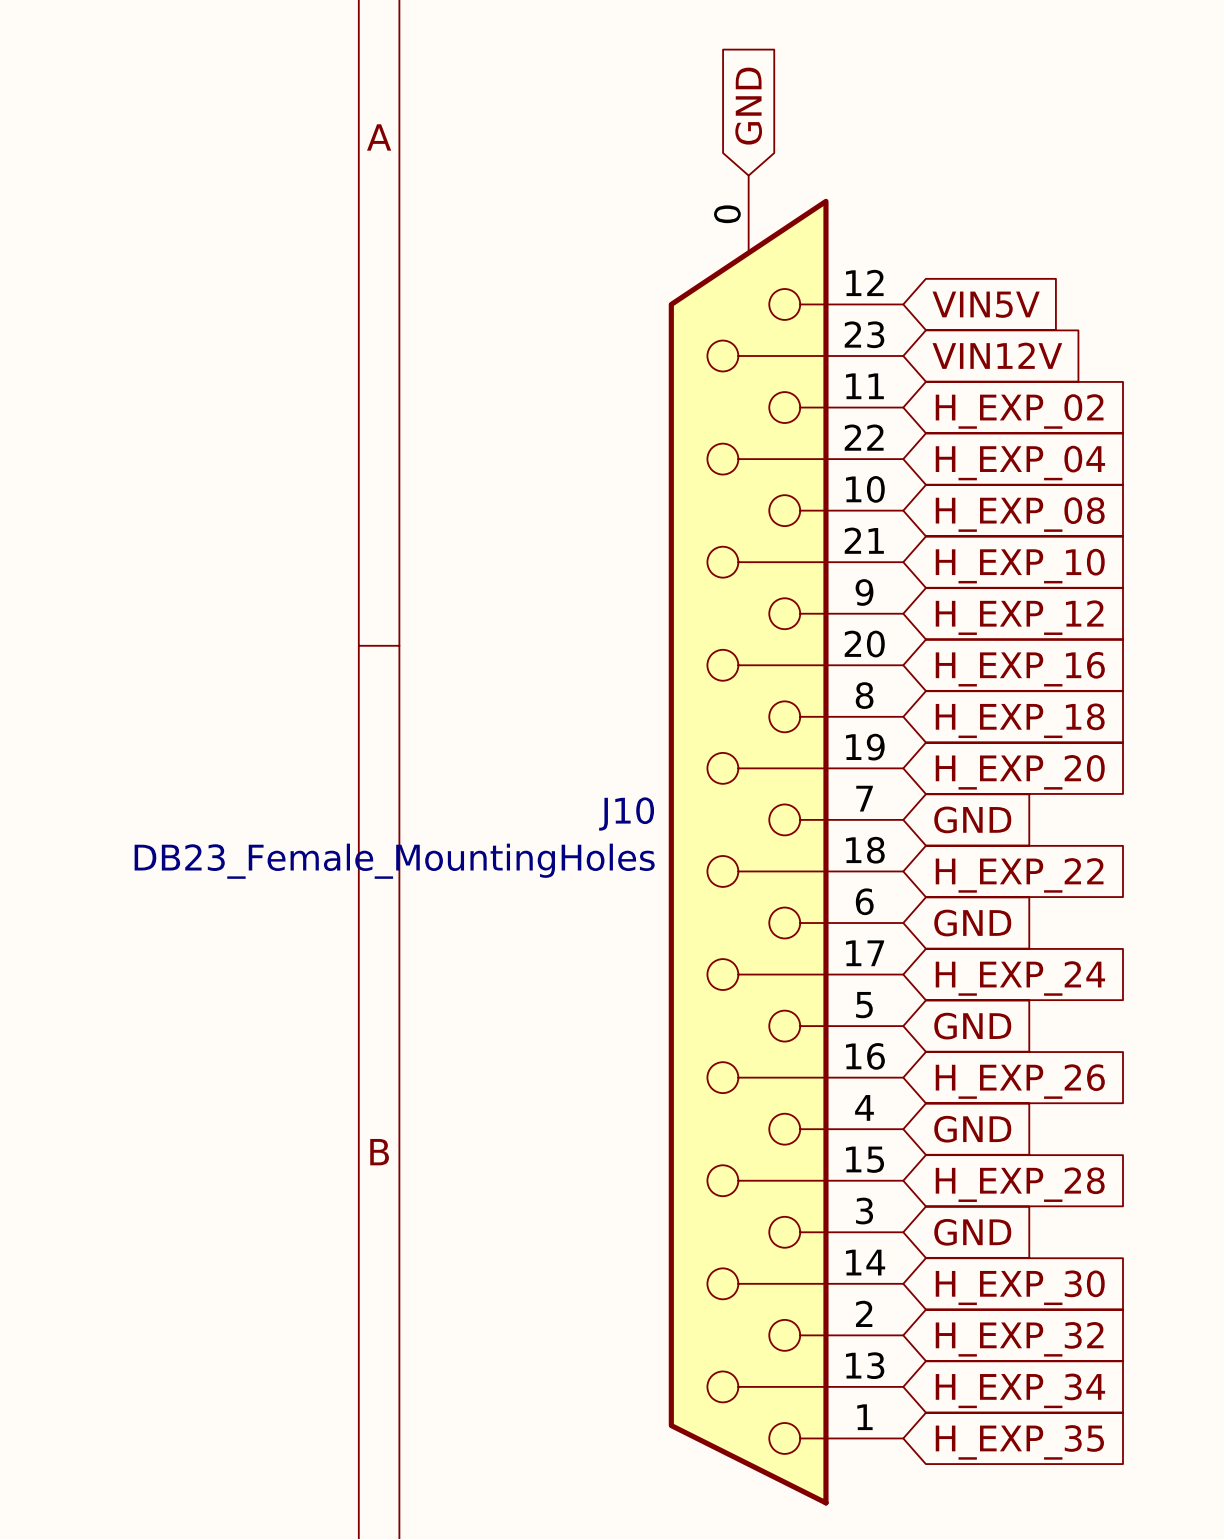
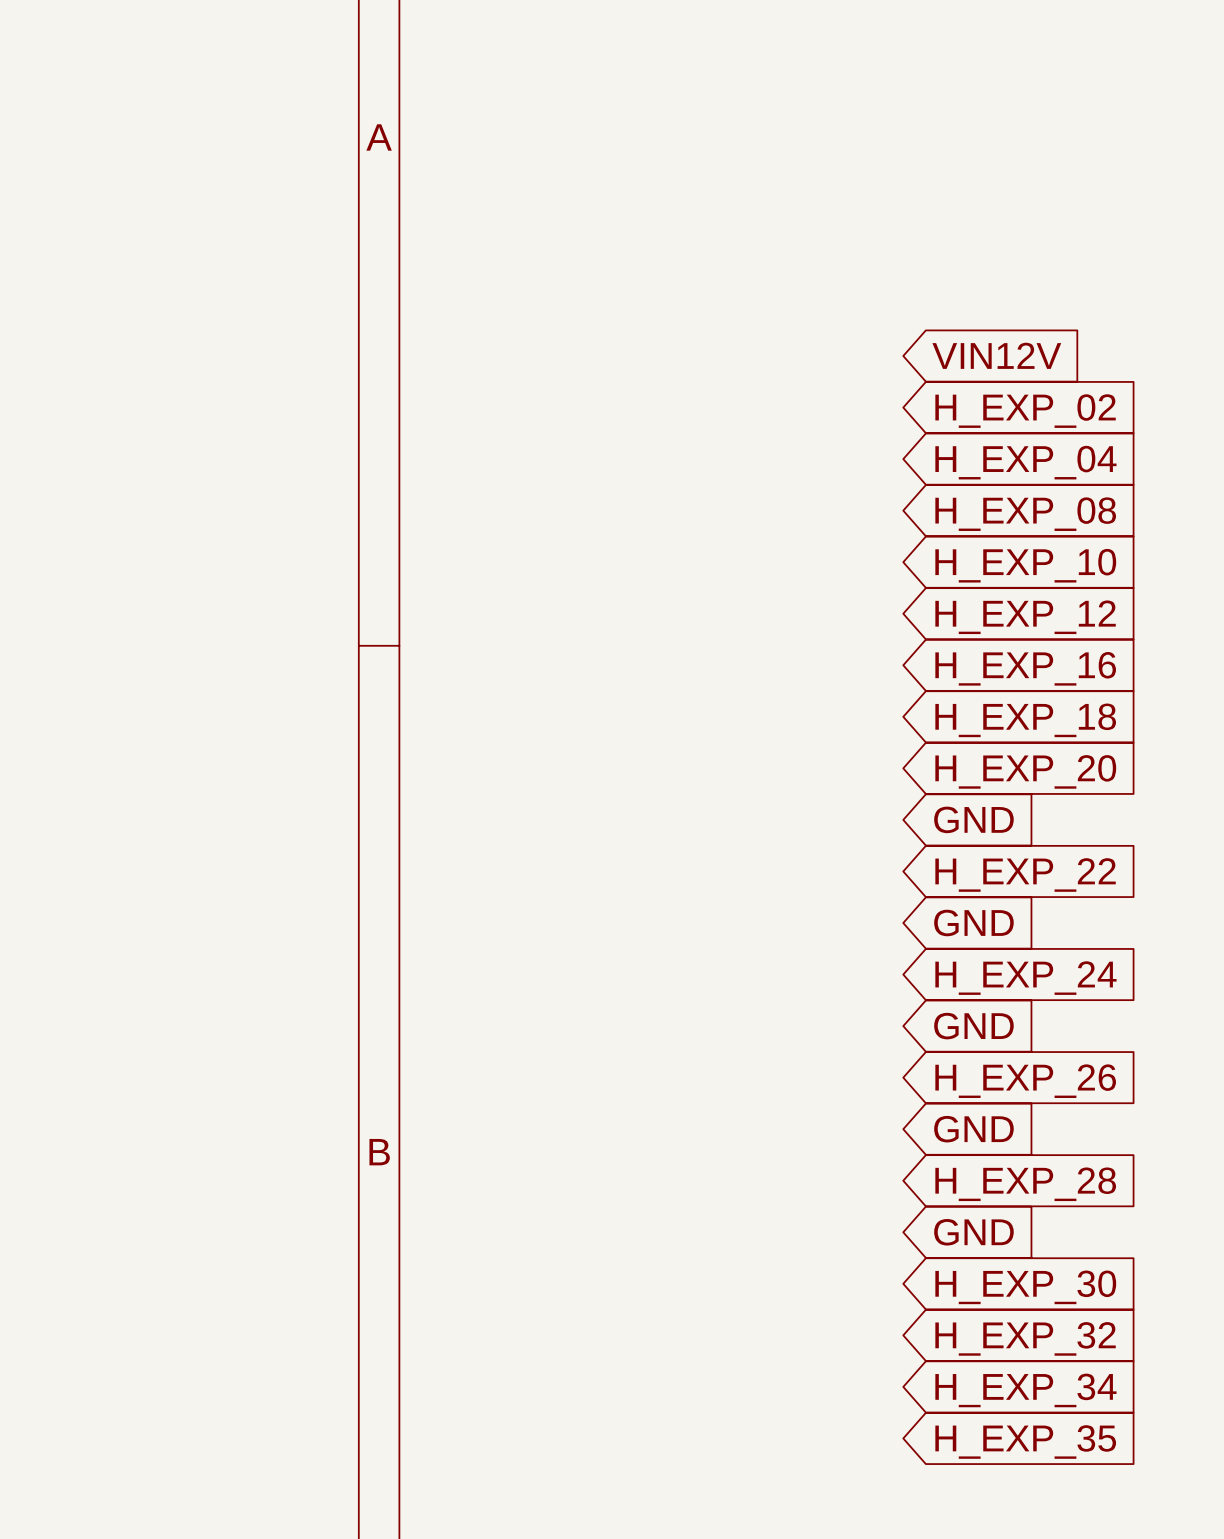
global label: GND (748, 106) -> none
global label: VIN5V (986, 304) -> none
J10: DB23_Female_MountingHoles (786, 840) -> none

